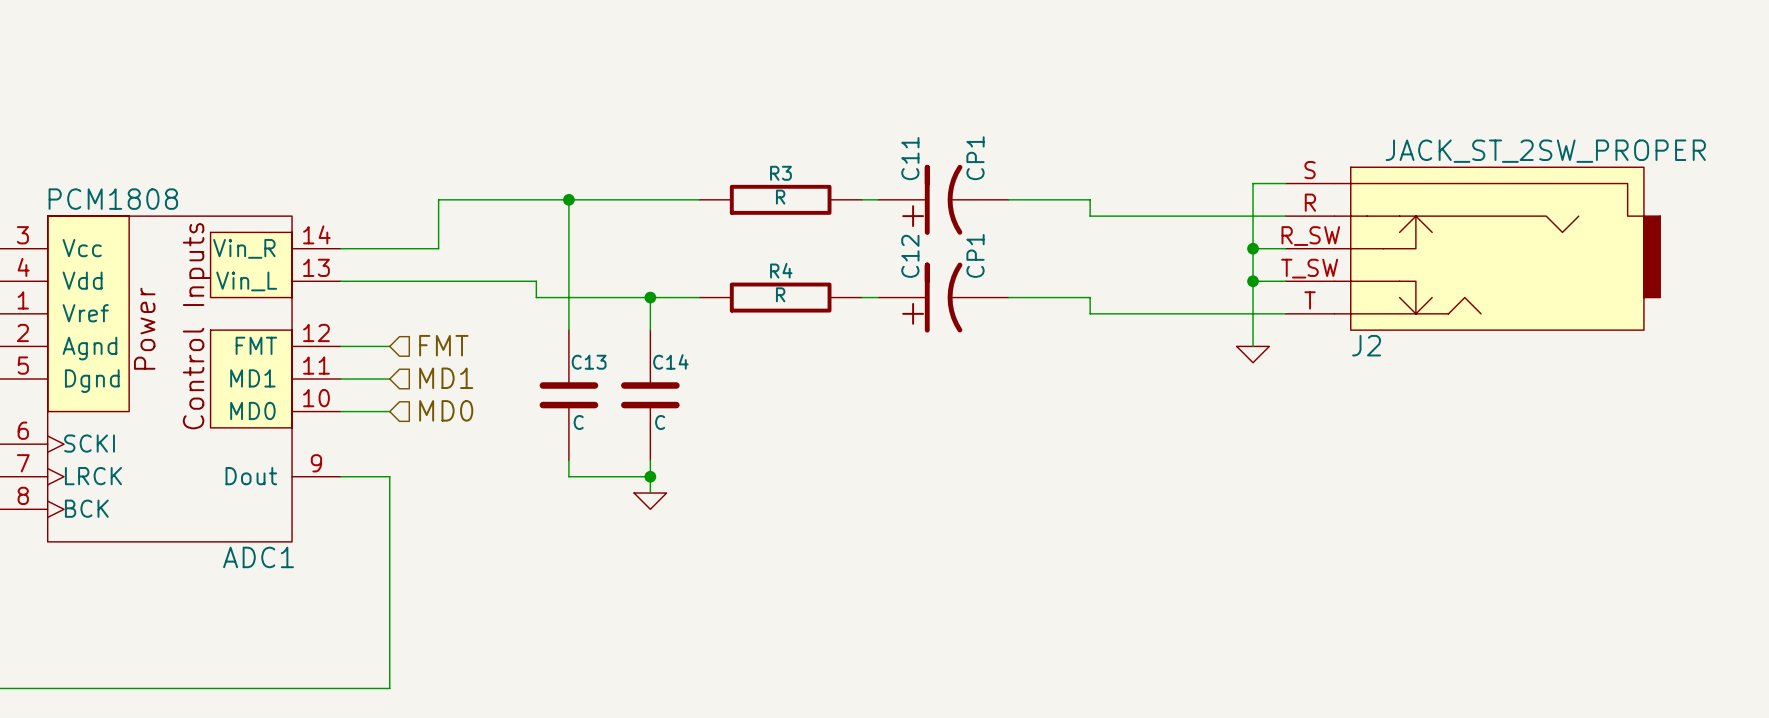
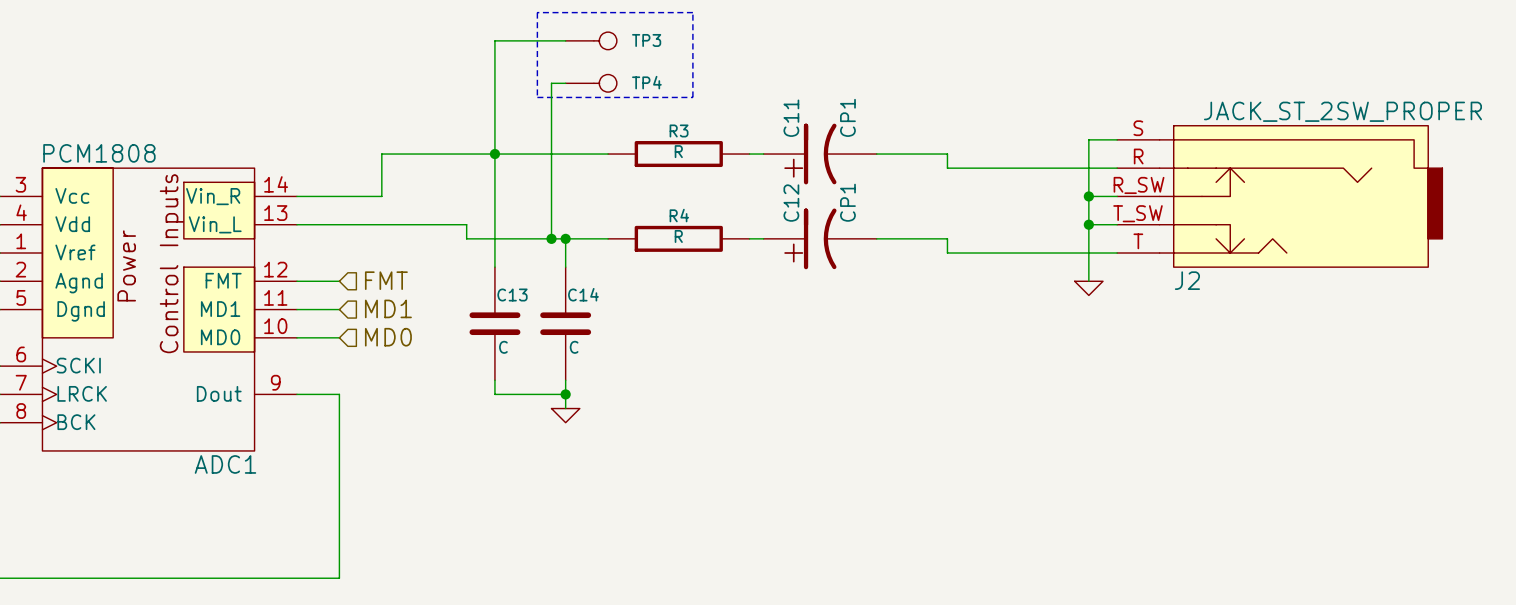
line: none -> (537, 12) (537, 97) (692, 97) (692, 12) (537, 12)
wire: none -> (565, 40) (494, 40) (494, 154)
TP3: none -> (591, 40)
wire: none -> (565, 83) (551, 83) (551, 238)
TP4: none -> (591, 83)
junction: none -> (551, 238)

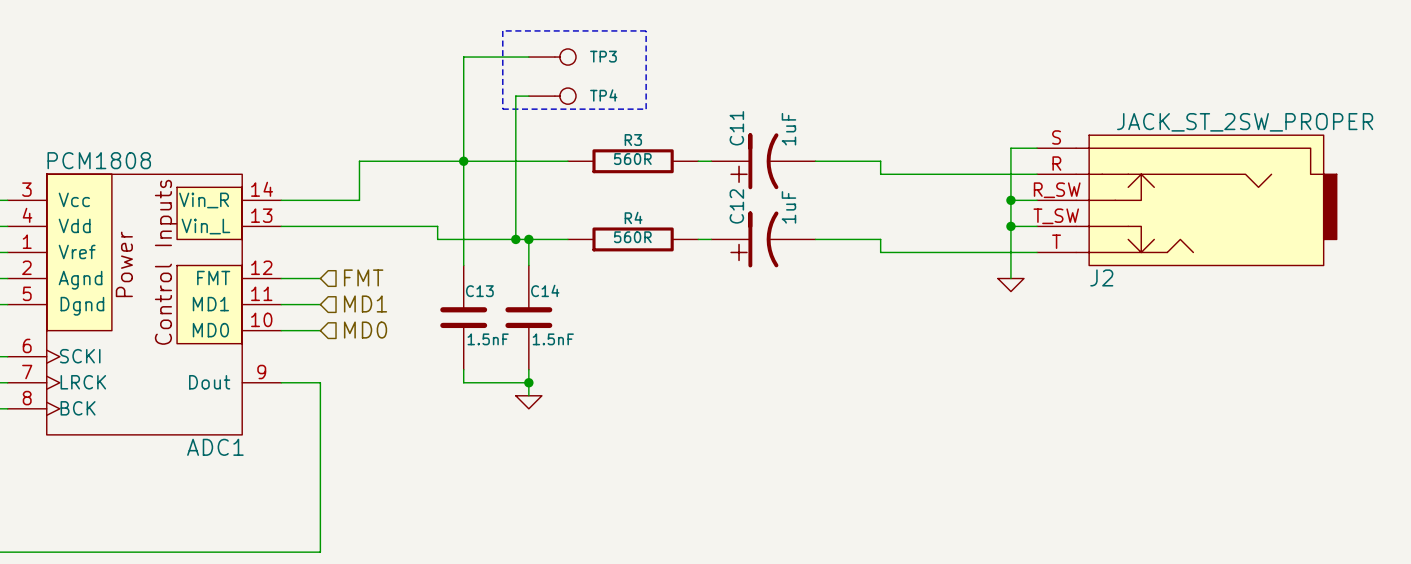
C11 value: CP1 (847, 117) -> 1uF (788, 129)
R3 value: R (678, 151) -> 560R (632, 159)
C12 value: CP1 (847, 202) -> 1uF (788, 207)
R4 value: R (678, 236) -> 560R (632, 237)
C13 value: C (503, 347) -> 1.5nF (488, 339)
C14 value: C (574, 347) -> 1.5nF (553, 339)

